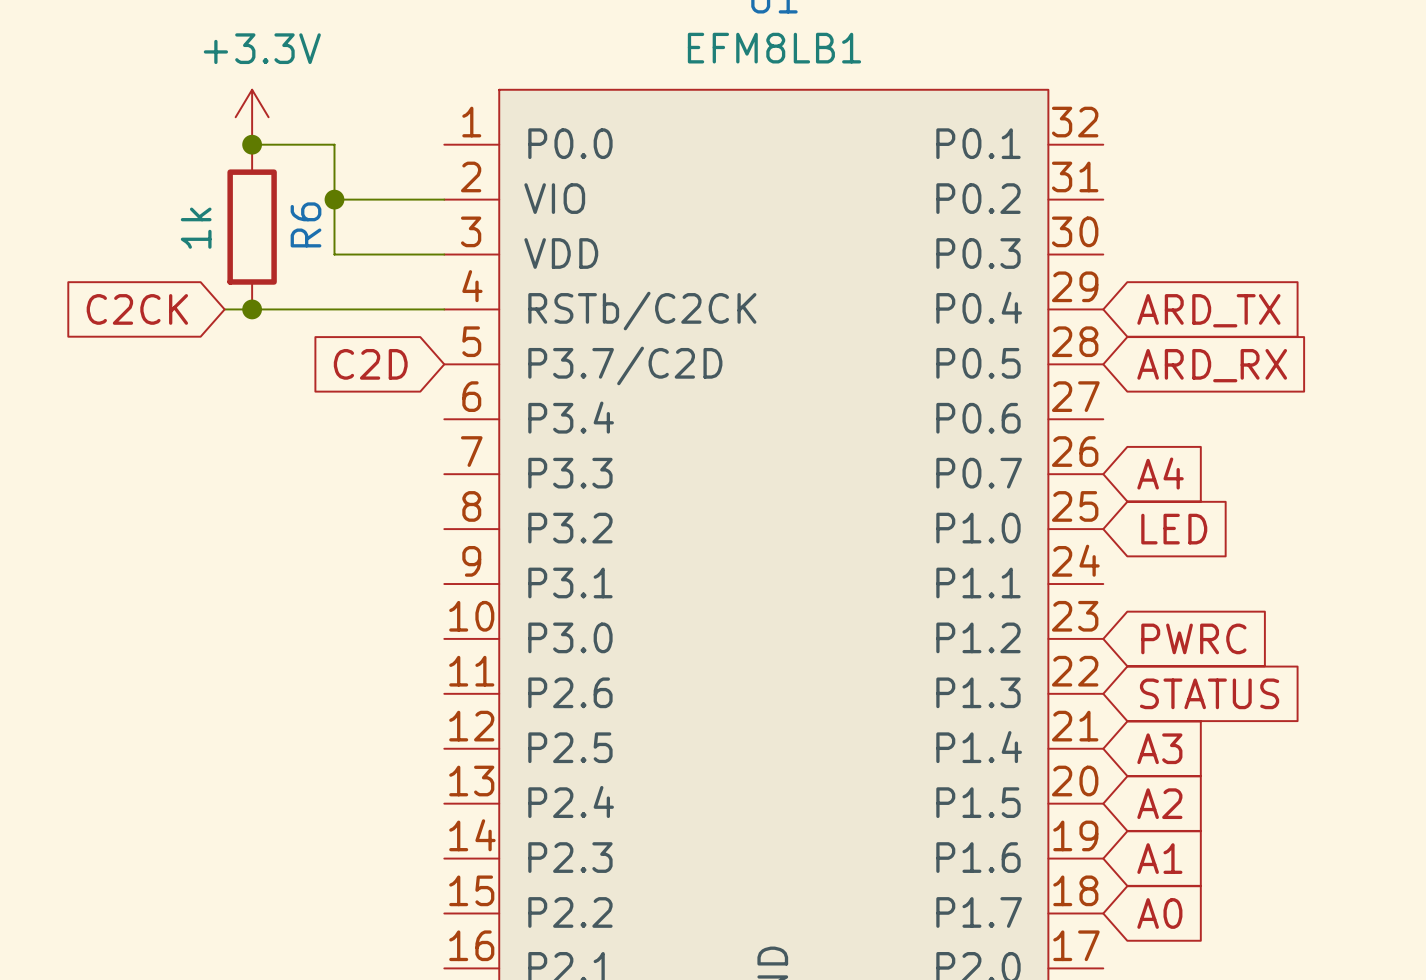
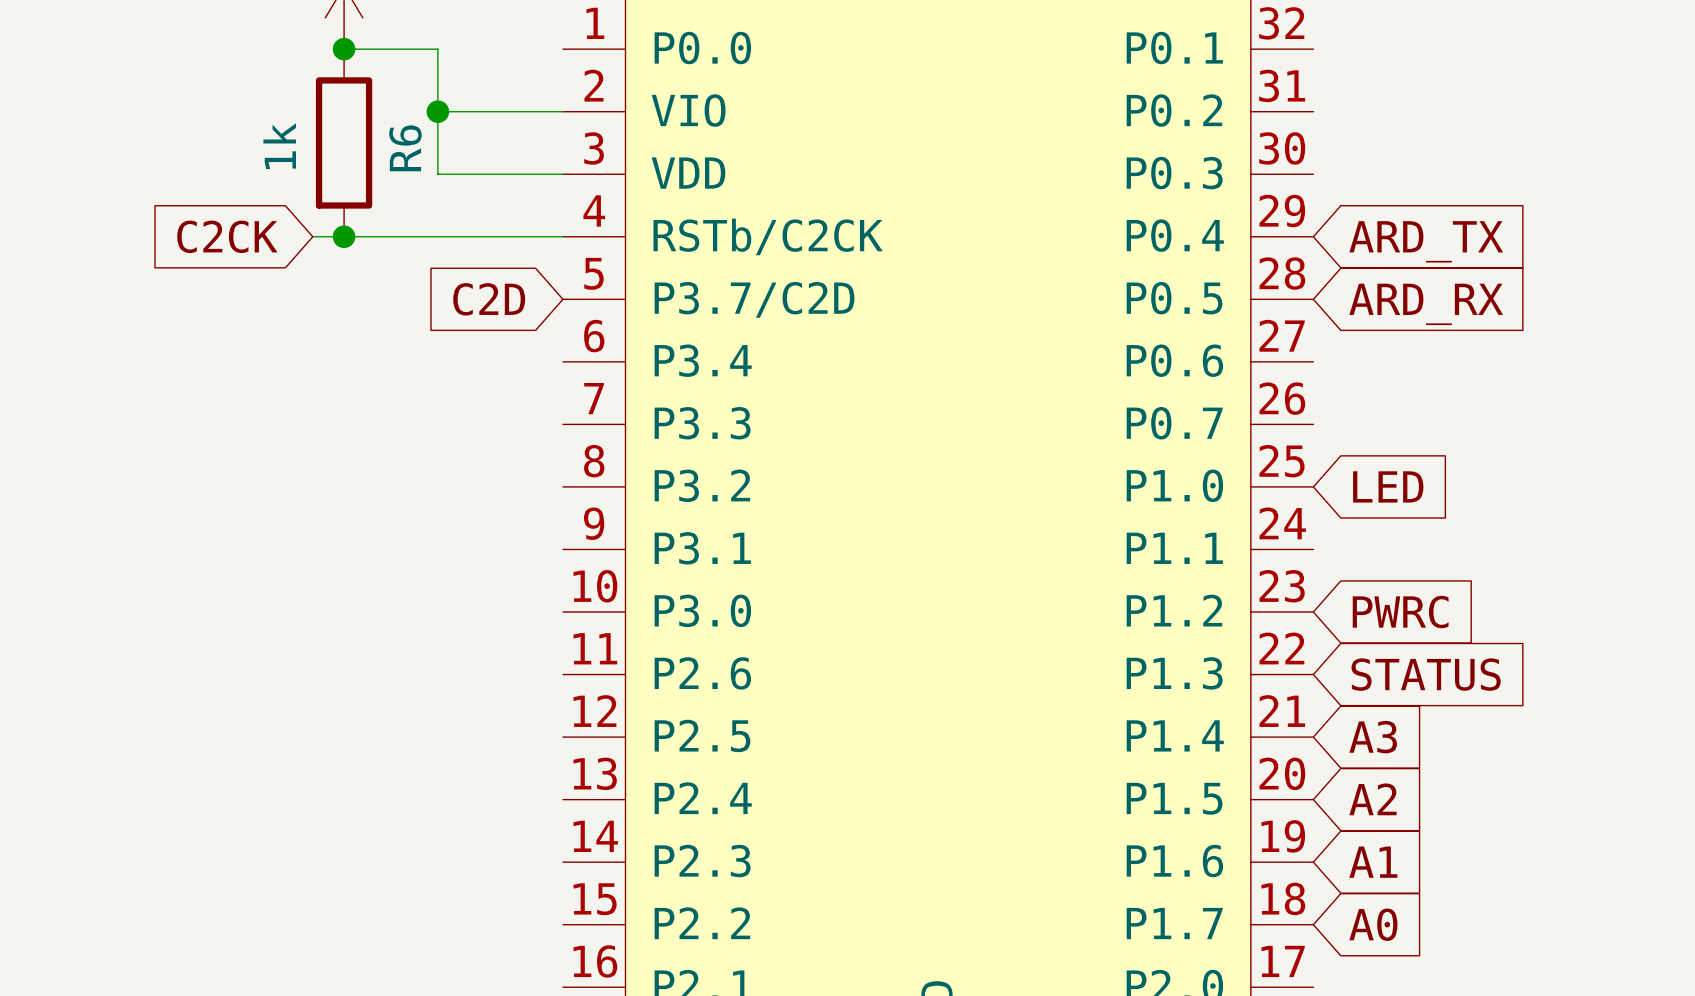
global label: A4 (1160, 473) -> none

